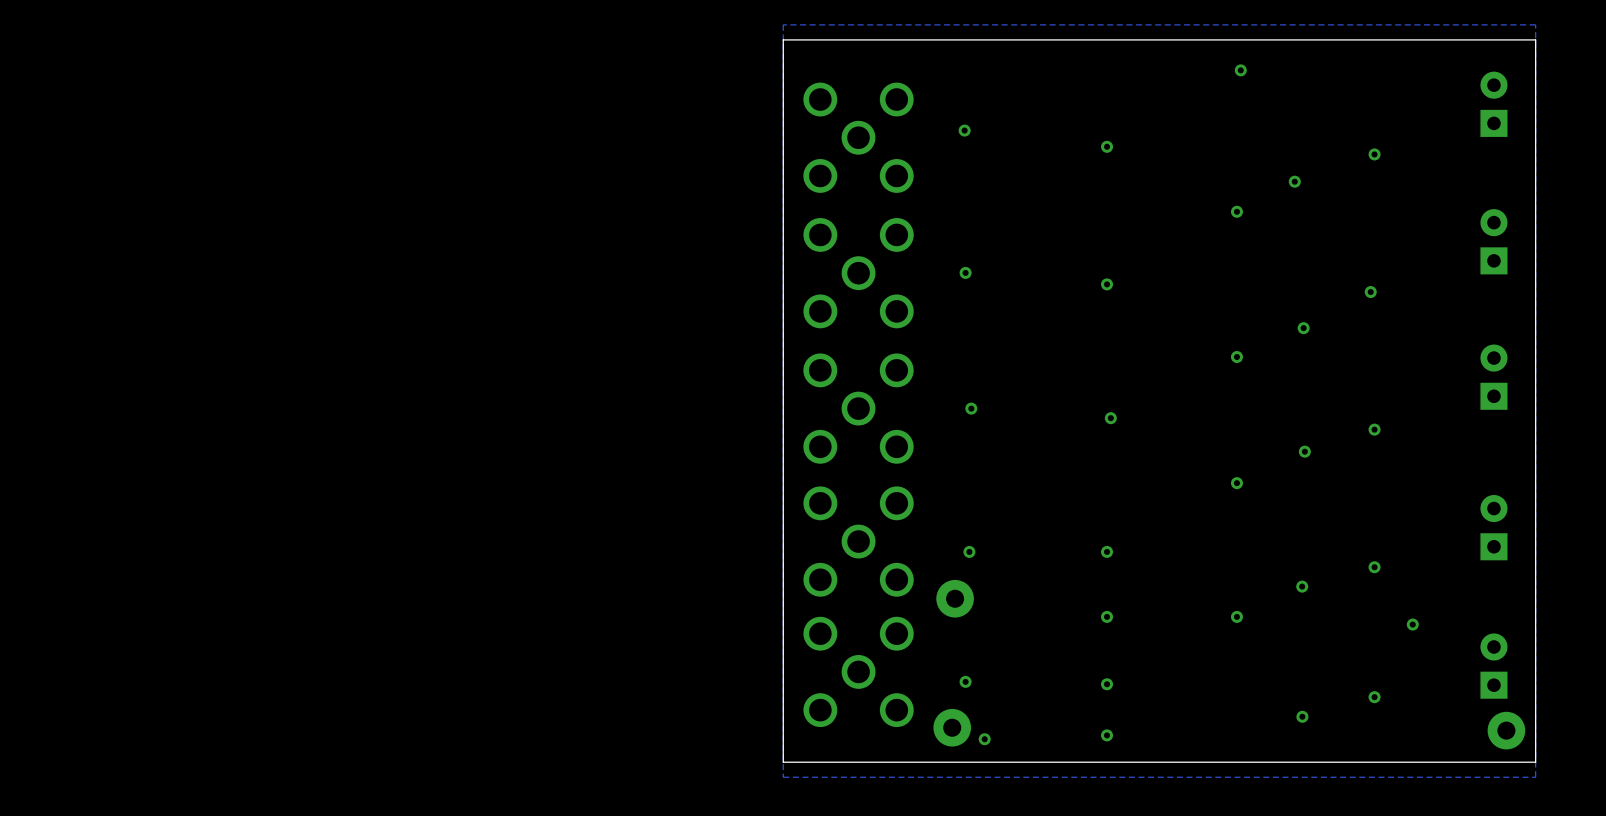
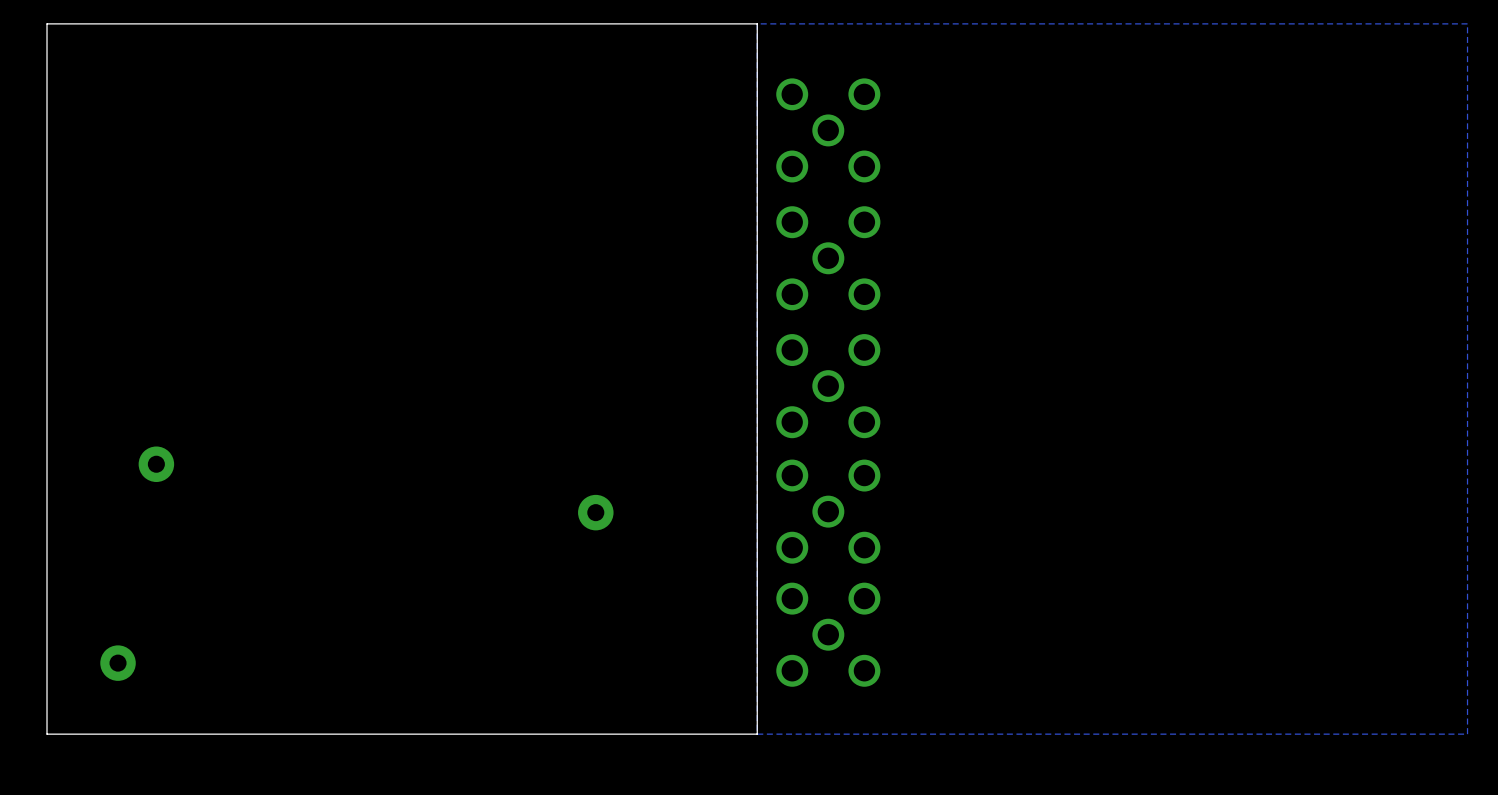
board edge: (783, 39) (1535, 39) (1535, 762) (783, 762) -> (757, 38) (757, 23) (47, 23) (47, 734) (757, 734) (757, 719)
via: (1240, 70) -> none
part: (1493, 104) -> none
via: (964, 130) -> none
via: (1107, 146) -> none
via: (1374, 154) -> none
via: (1294, 181) -> none
via: (1236, 211) -> none
part: (1493, 241) -> none
via: (965, 272) -> none
via: (1107, 284) -> none
via: (1370, 292) -> none
via: (1303, 328) -> none
via: (1236, 357) -> none
part: (1493, 377) -> none
via: (971, 408) -> none
via: (1110, 418) -> none
via: (1374, 429) -> none
via: (1304, 451) -> none
via: (1236, 483) -> none
part: none -> (156, 464)
part: (1493, 527) -> none
part: none -> (595, 512)
via: (969, 551) -> none
via: (1107, 551) -> none
via: (1374, 567) -> none
via: (1302, 586) -> none
part: (955, 598) -> none
via: (1107, 616) -> none
via: (1236, 616) -> none
via: (1412, 624) -> none
part: (1493, 666) -> none
via: (965, 681) -> none
via: (1107, 684) -> none
via: (1374, 697) -> none
part: none -> (118, 663)
via: (1302, 716) -> none
part: (952, 727) -> none
part: (1506, 730) -> none
via: (1107, 735) -> none
via: (984, 739) -> none

